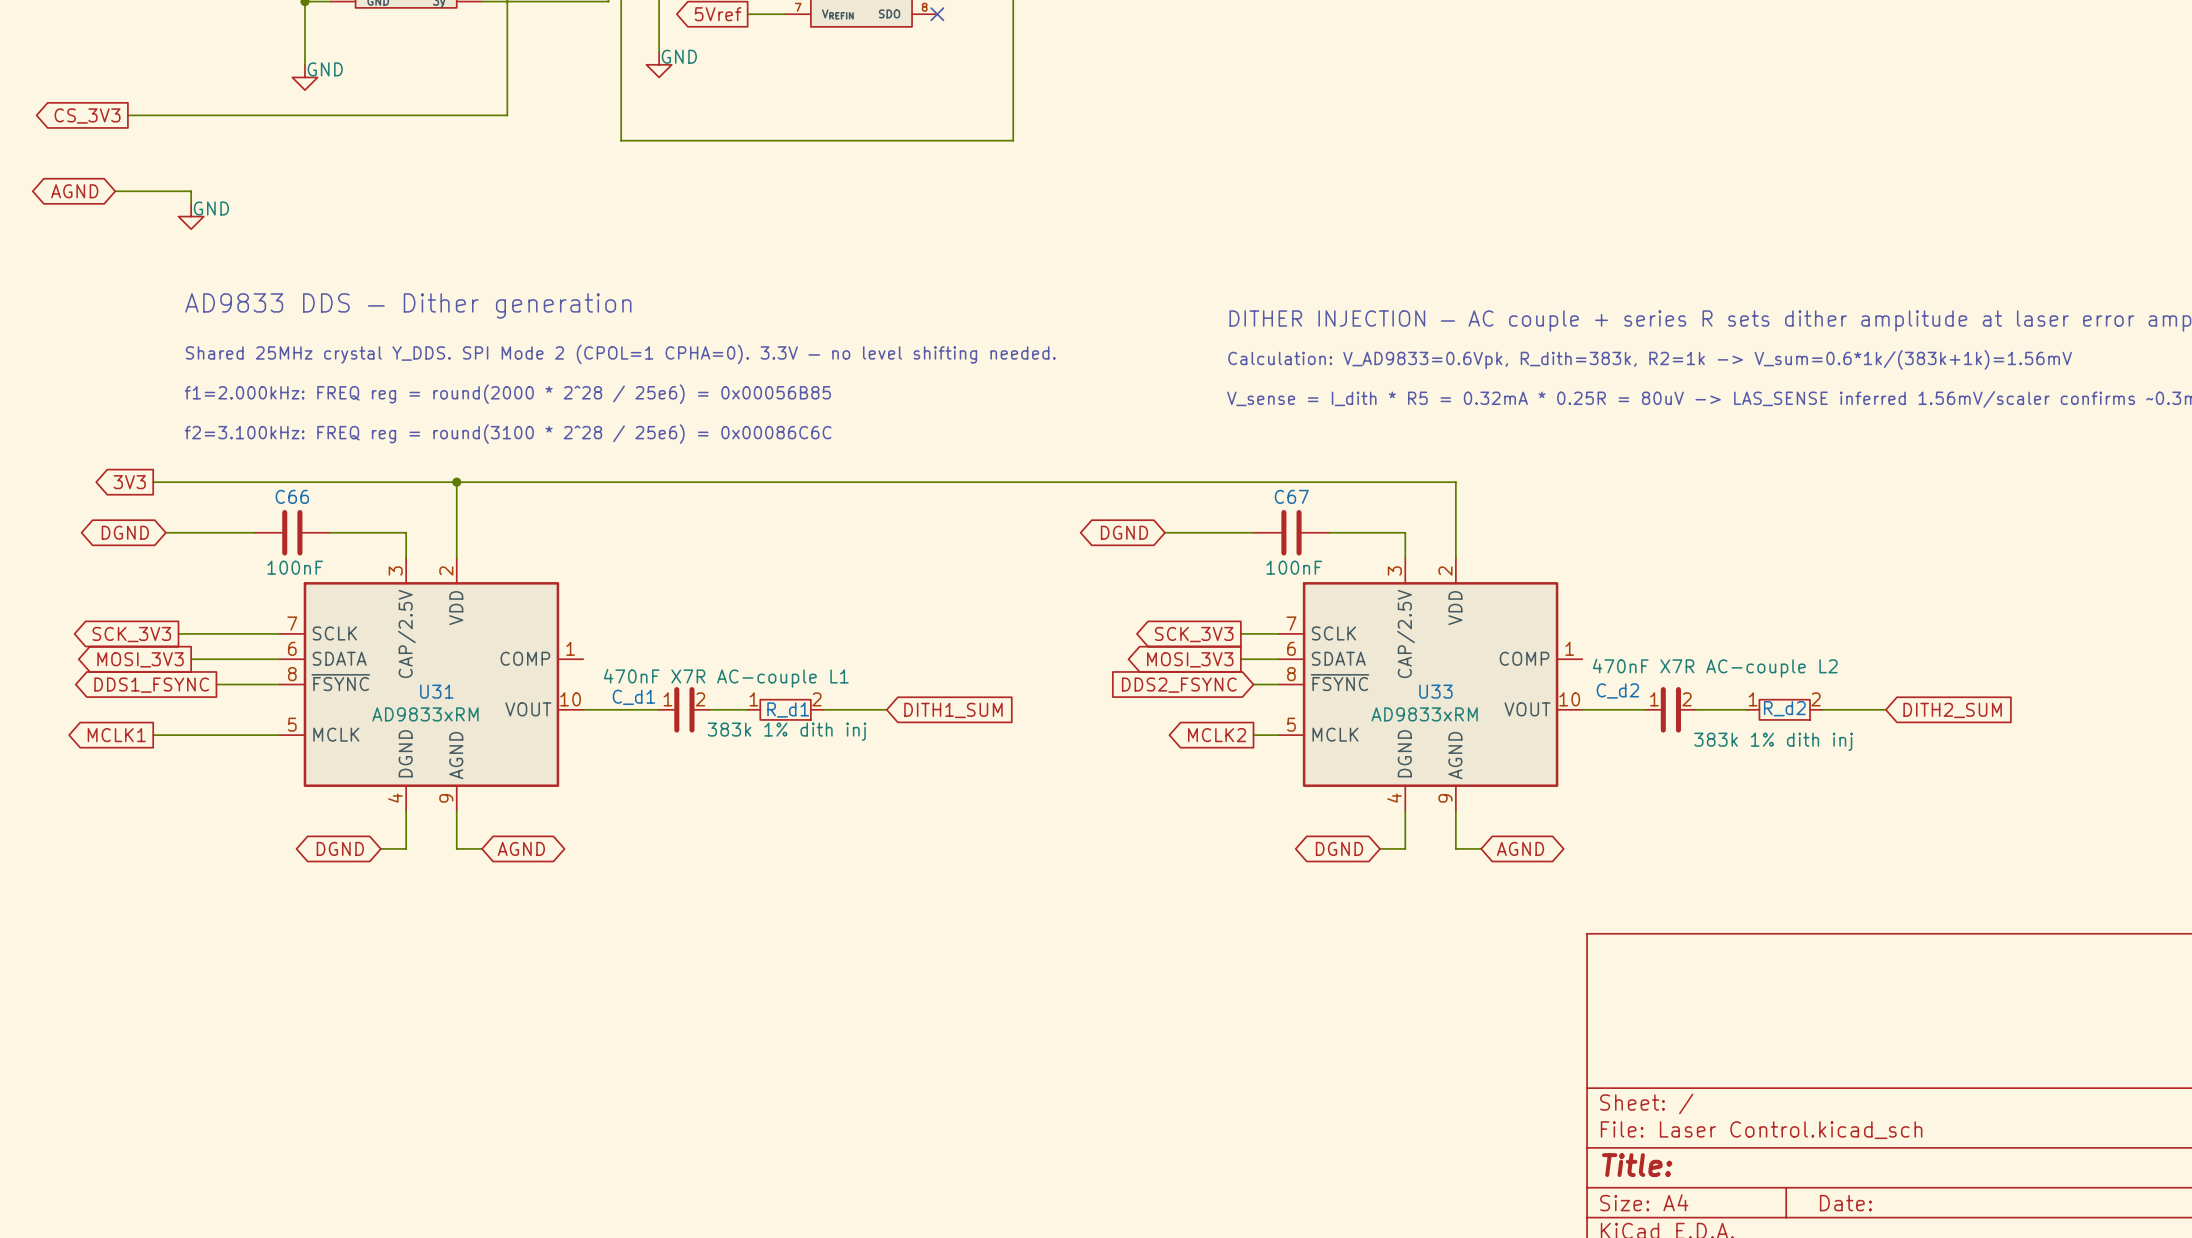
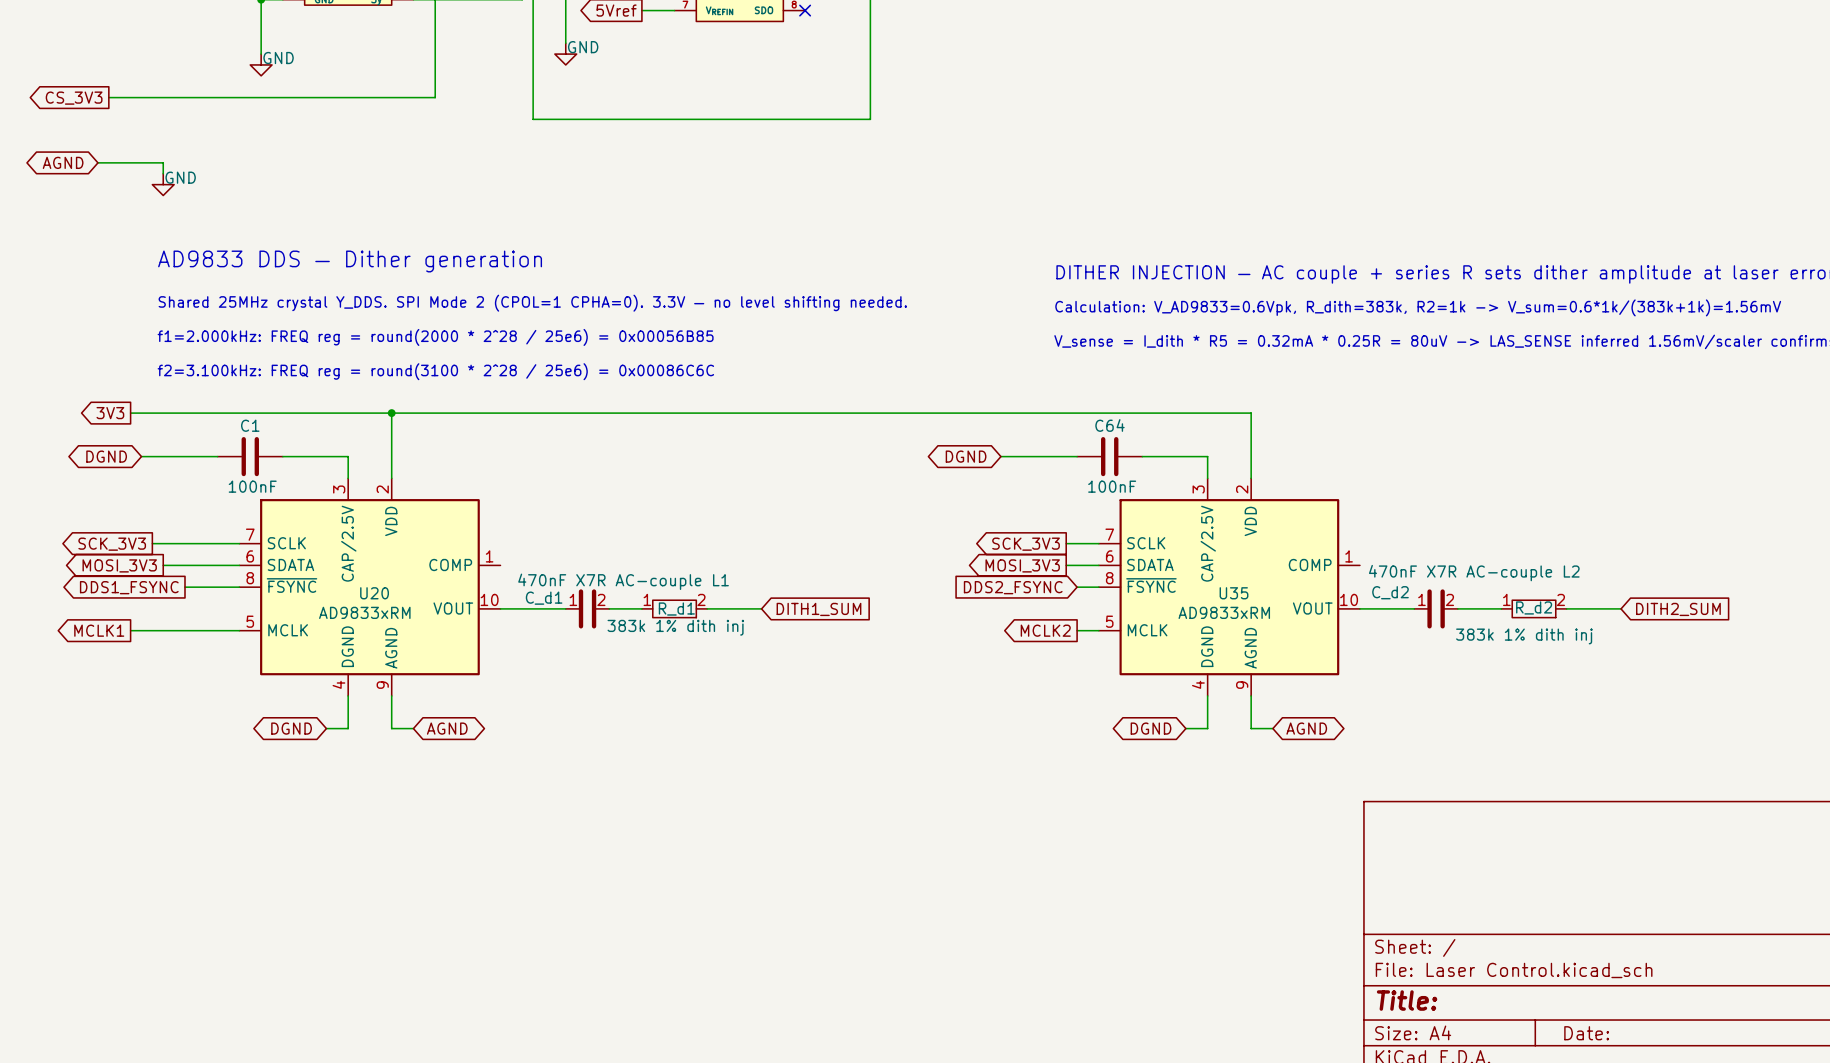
C66 name: C66 (292, 496) -> C1 (250, 425)
C67 name: C67 (1291, 496) -> C64 (1109, 425)
U31 name: U31 (436, 691) -> U20 (374, 593)
U33 name: U33 (1435, 691) -> U35 (1234, 593)

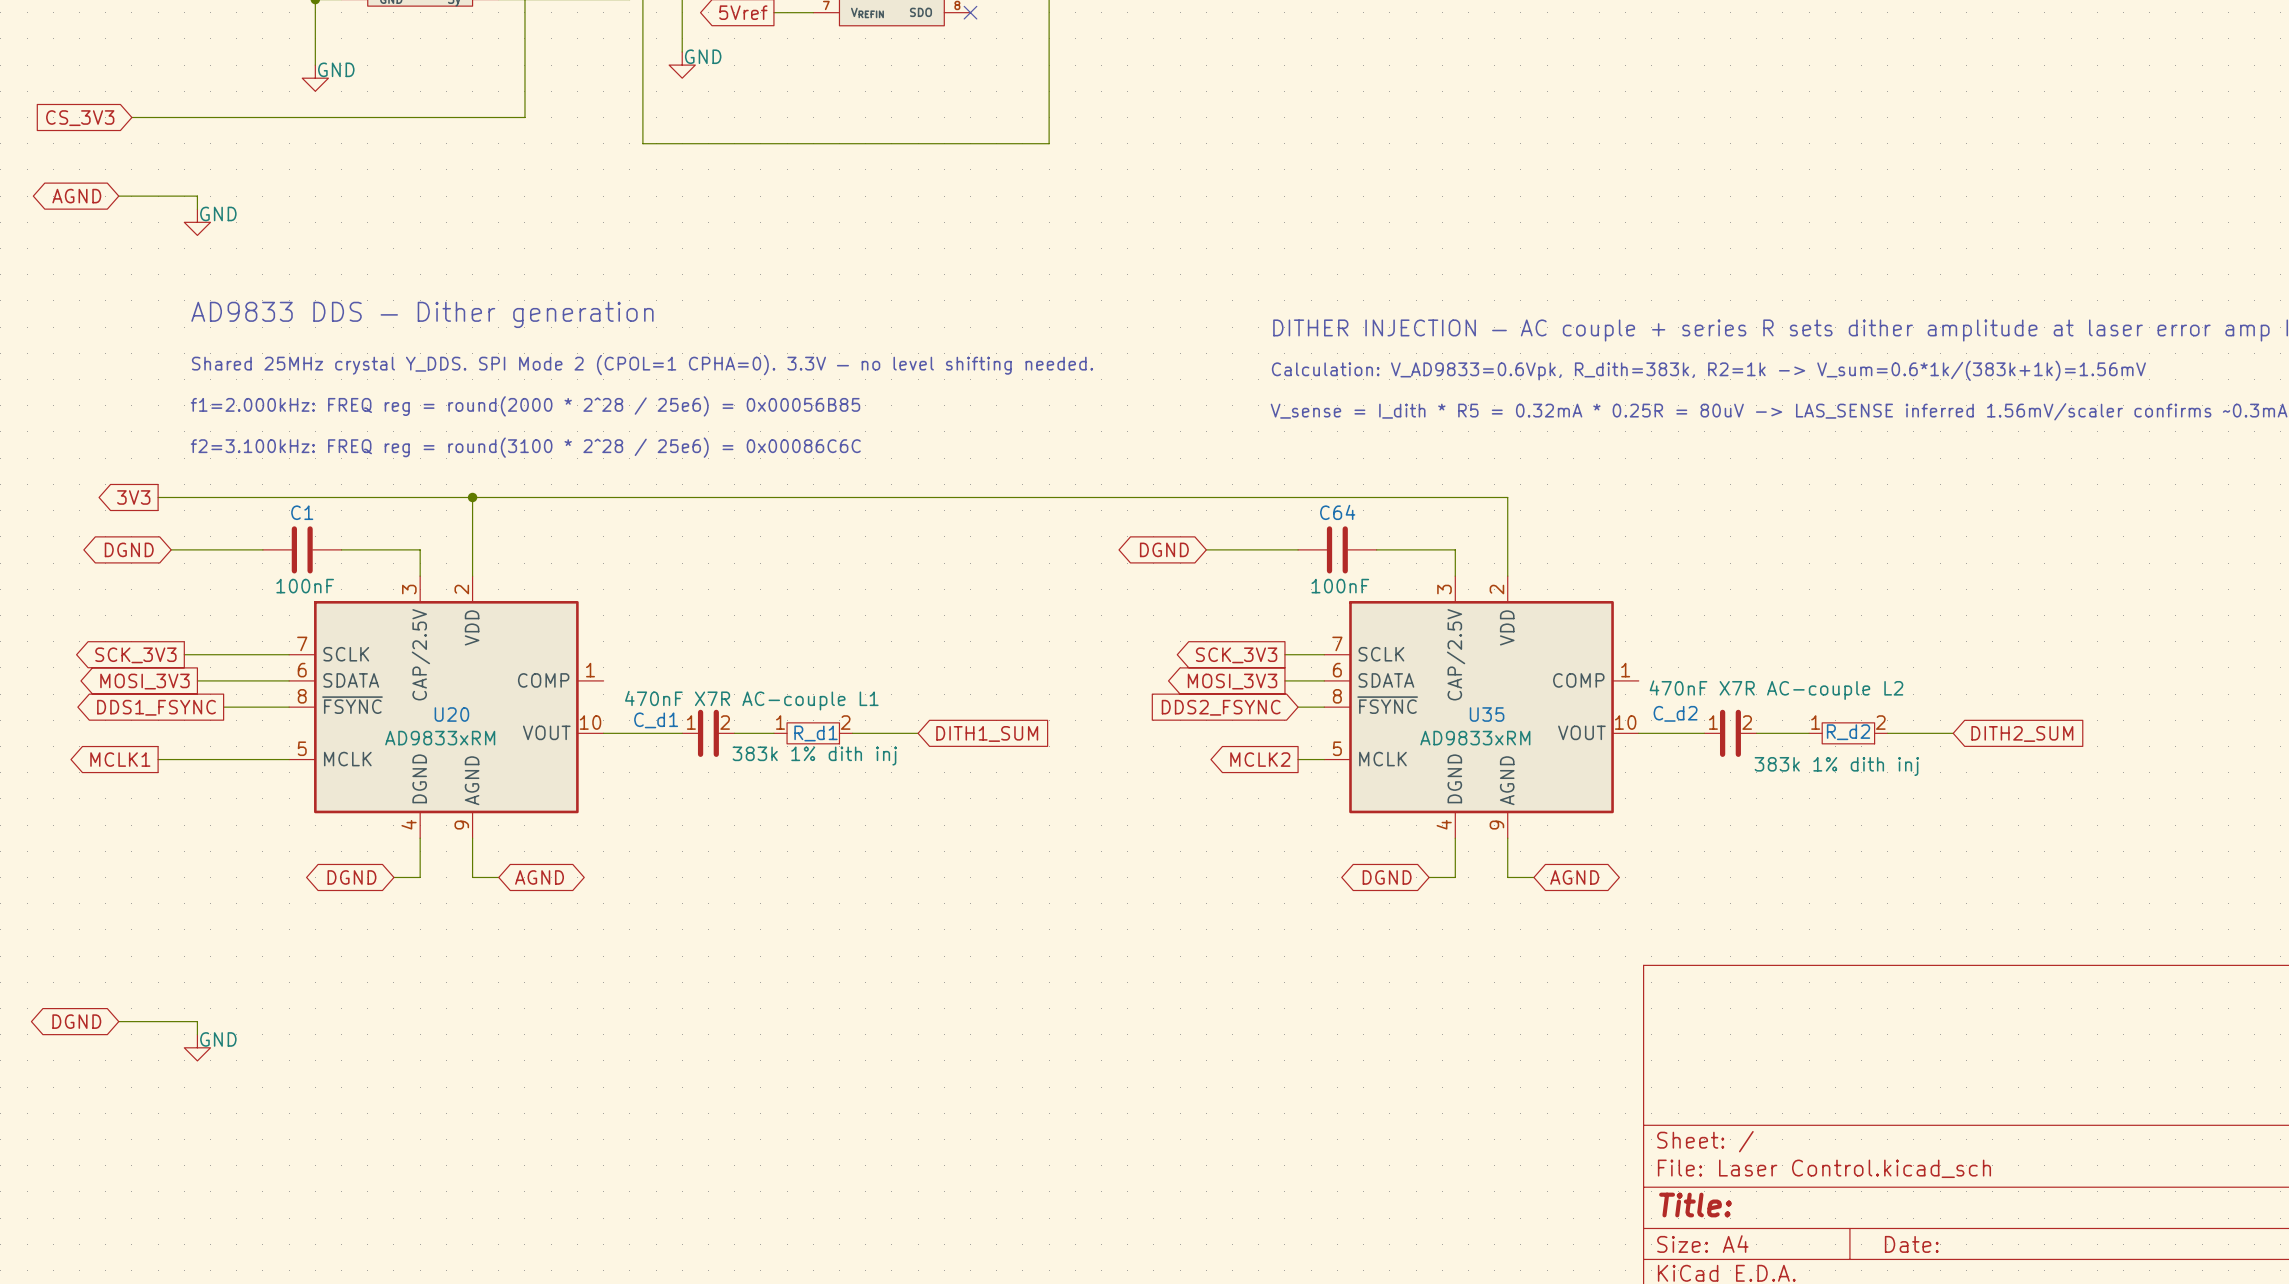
global label shape: output (74, 98) -> input (80, 118)
global label: none -> DGND (76, 1021)
wire: none -> (118, 1021) (197, 1021) (197, 1034)
power symbol: none -> GND (197, 1047)

